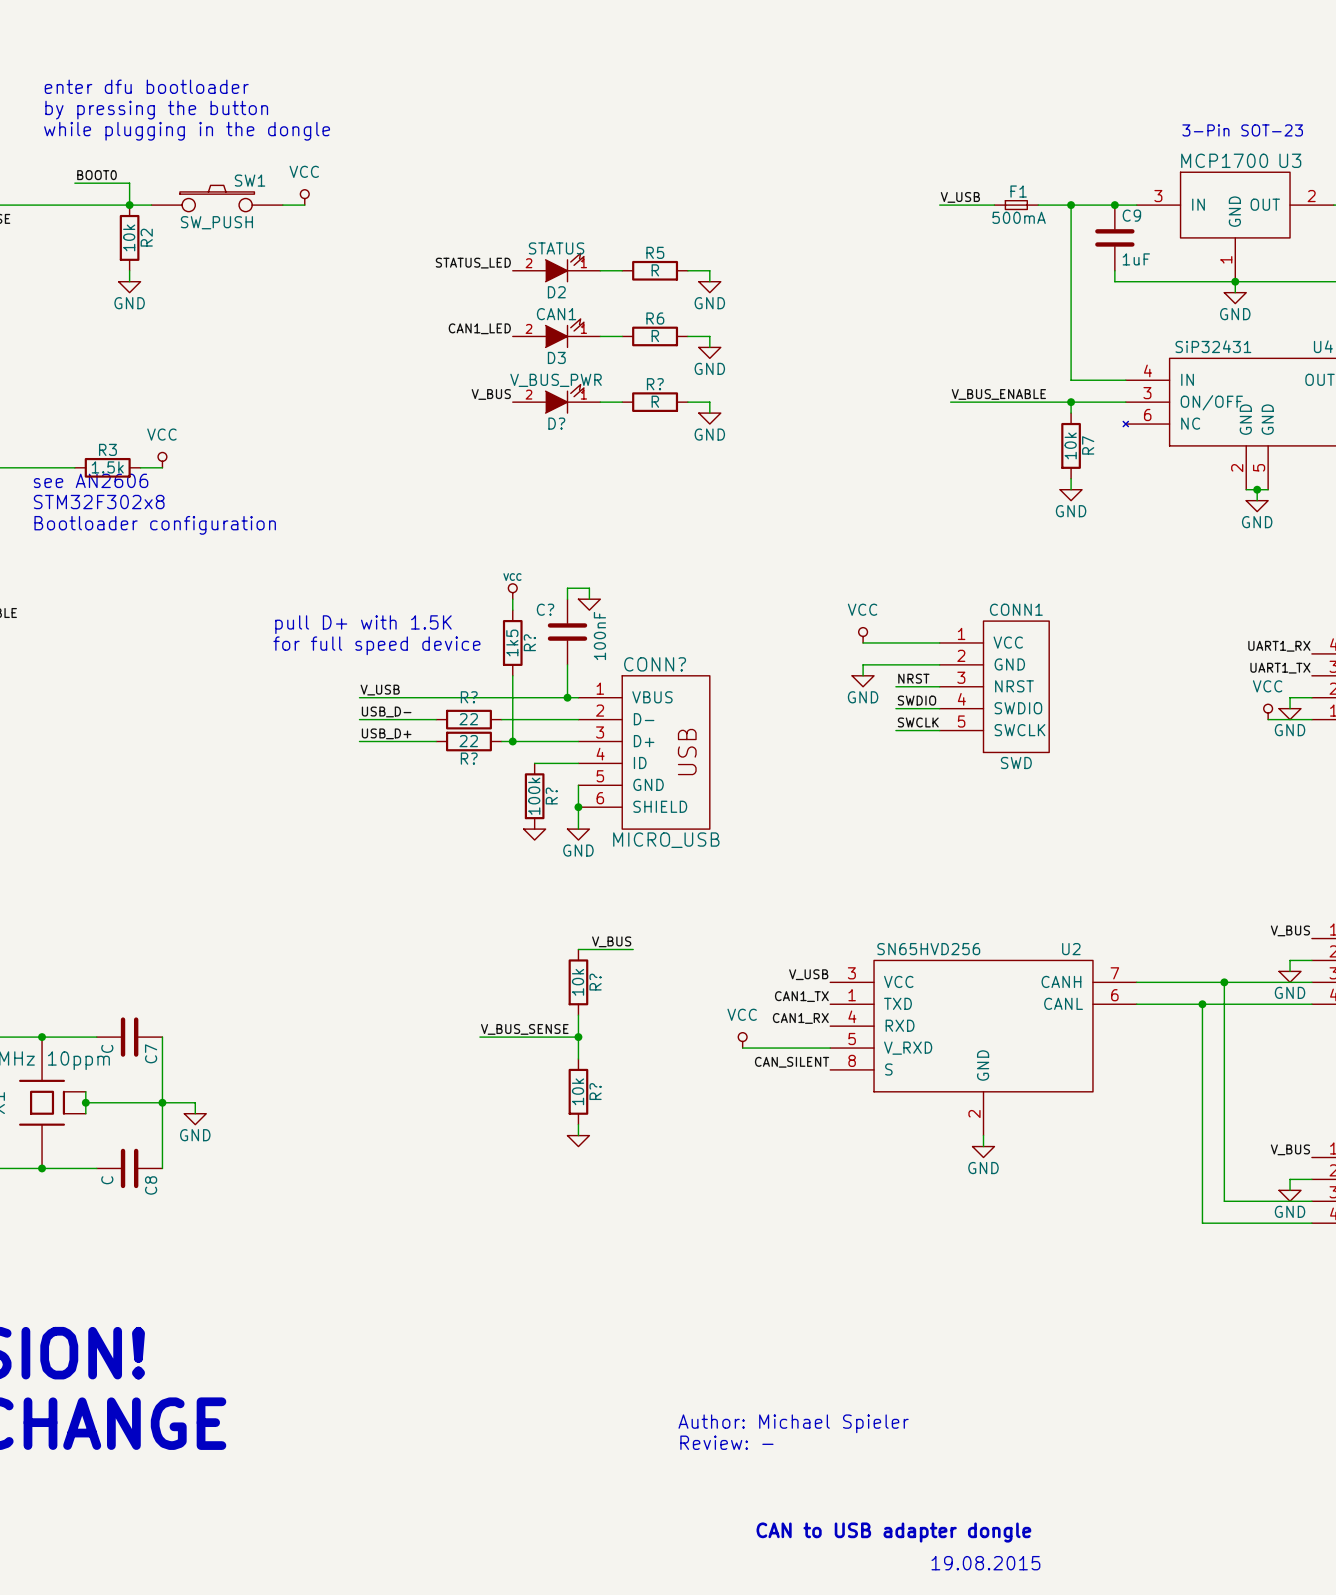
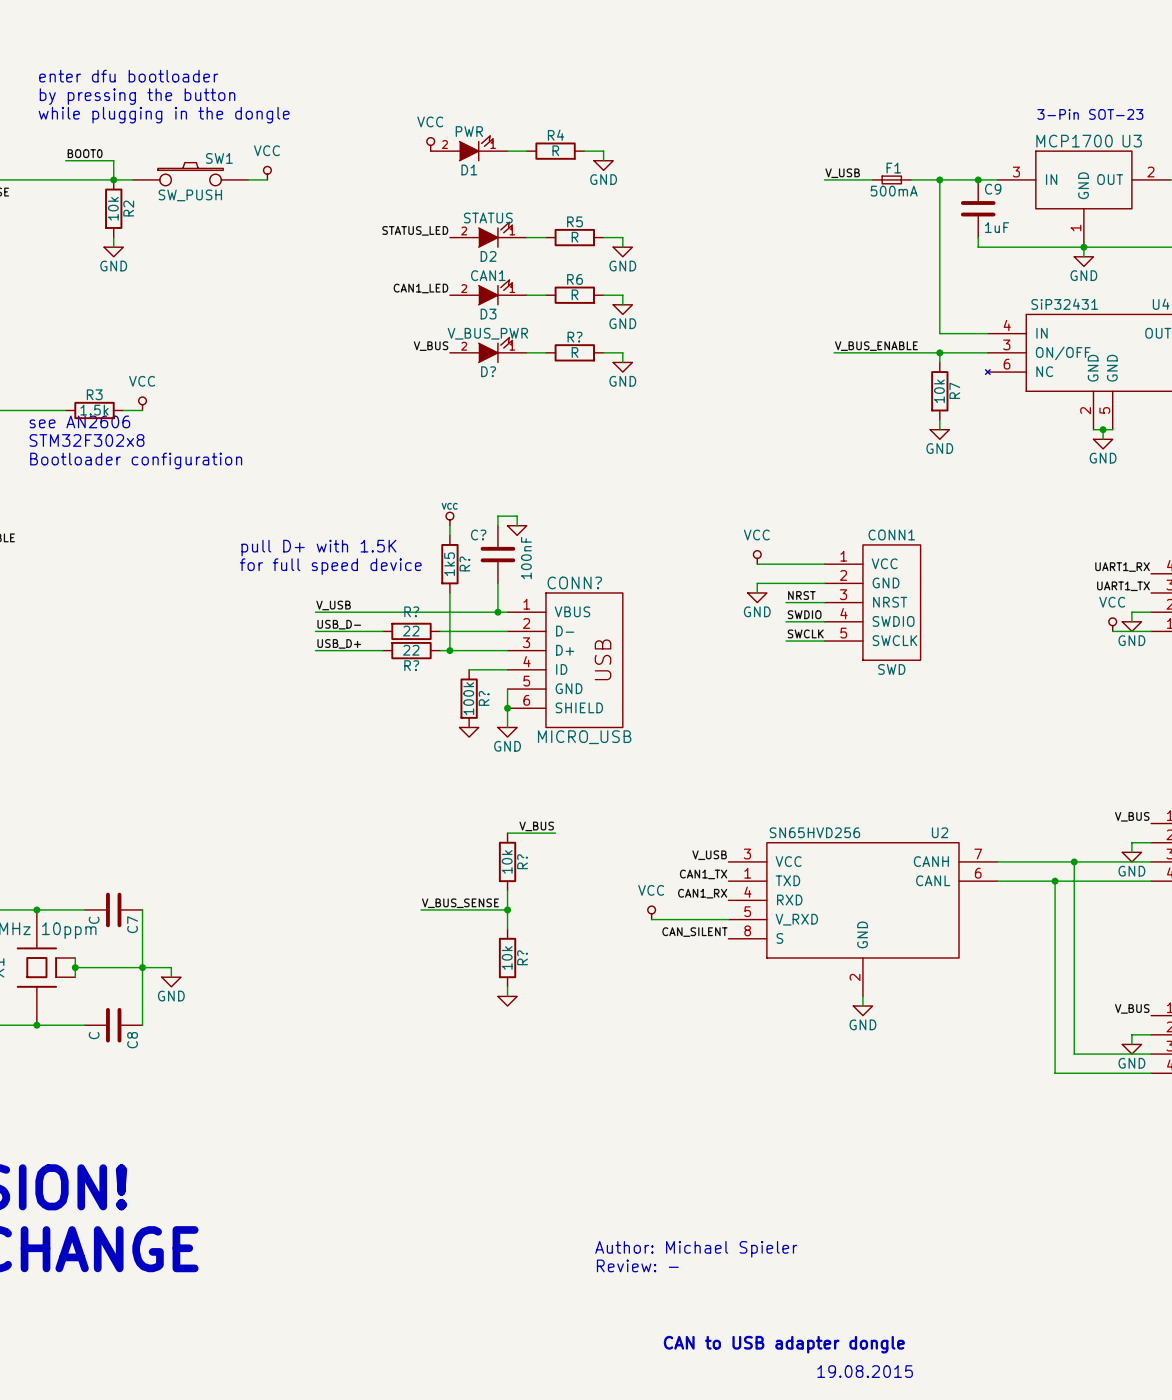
power symbol: none -> VCC (430, 144)
D1: none -> PWR (469, 148)
wire: none -> (507, 151) (526, 151)
R4: none -> R (555, 151)
wire: none -> (584, 151) (603, 151) (603, 160)
power symbol: none -> GND (603, 165)

